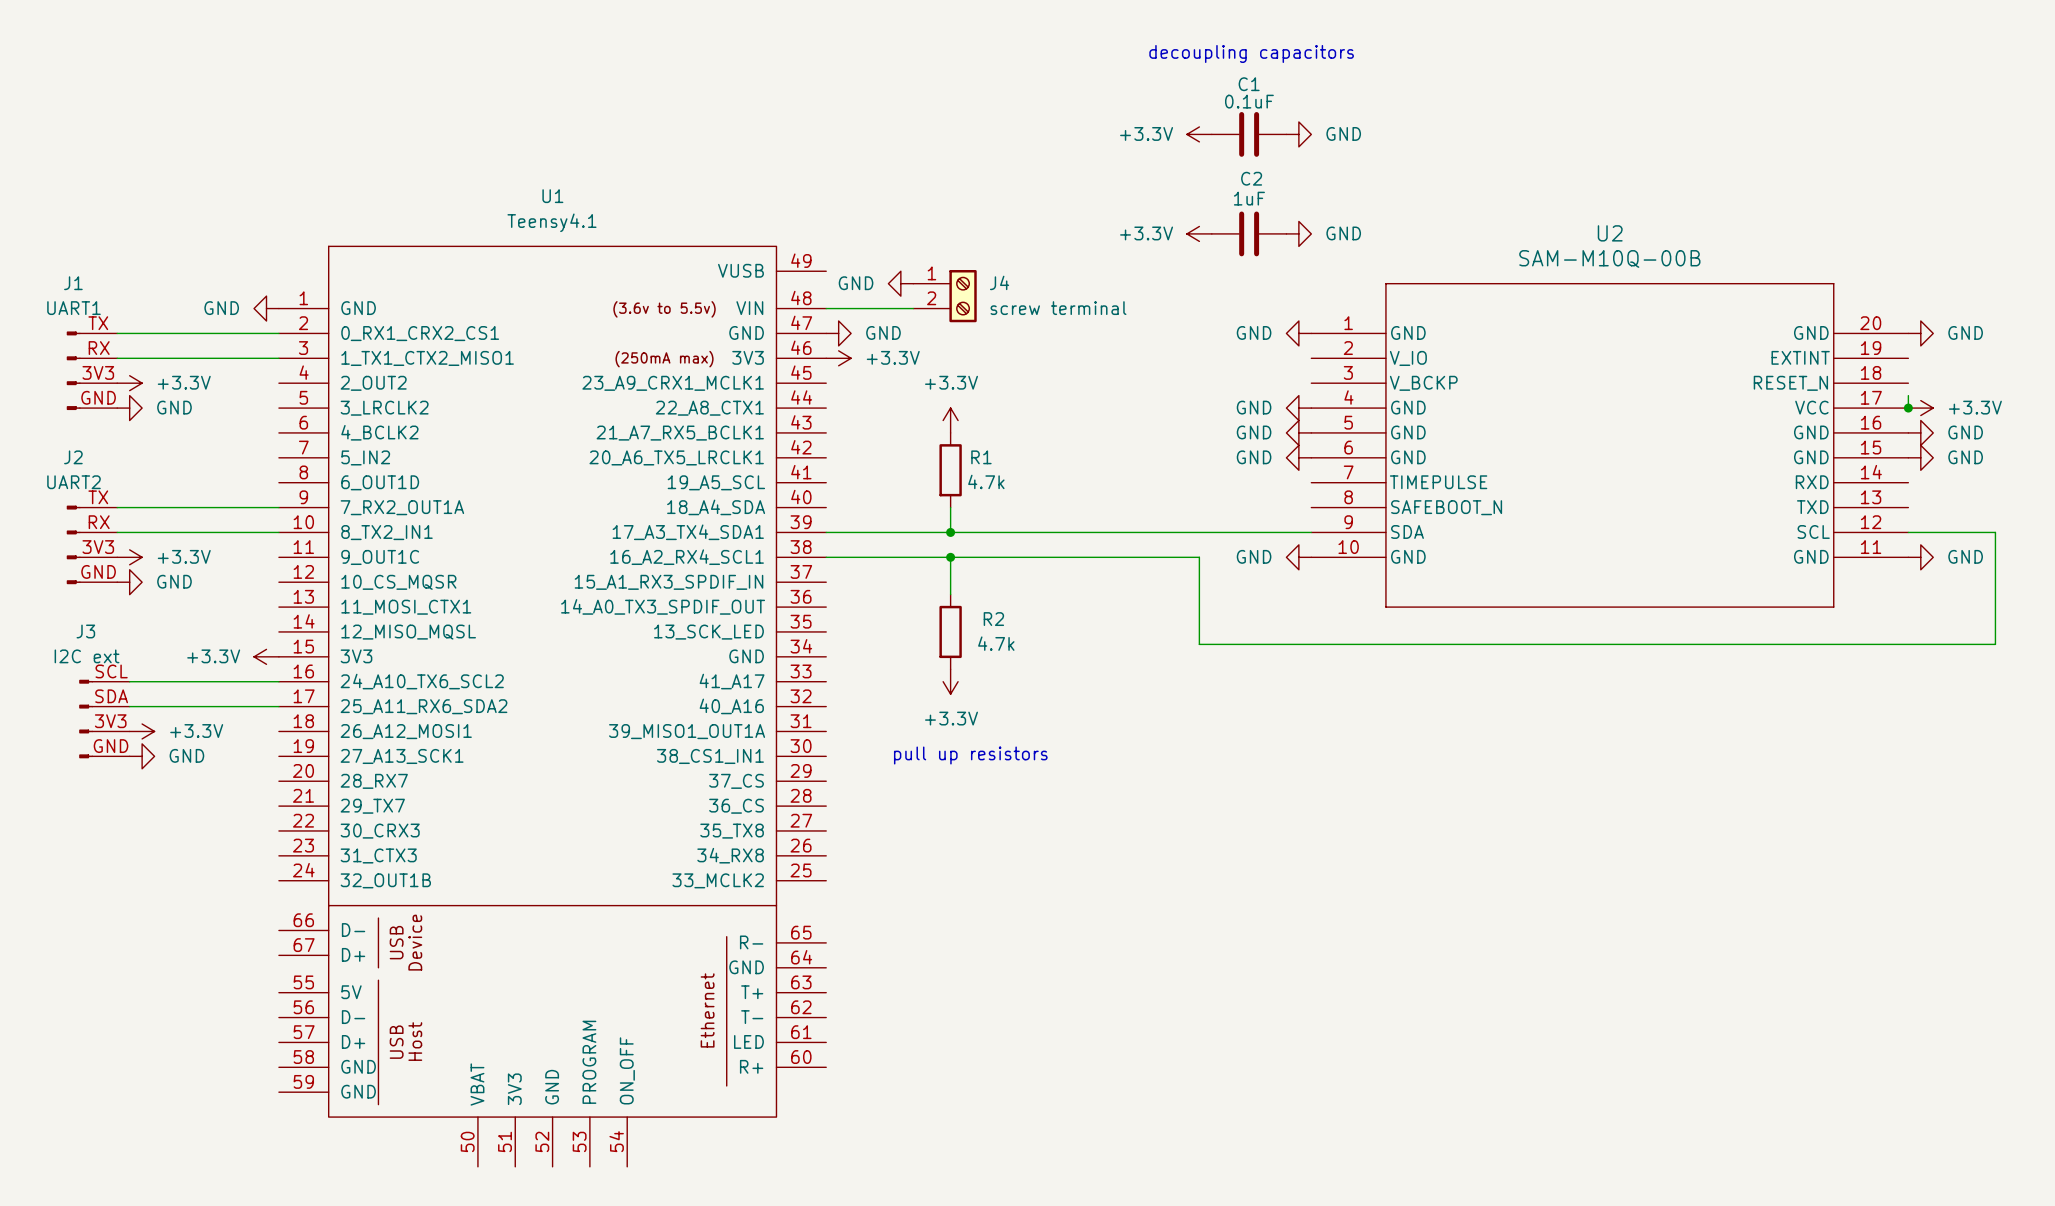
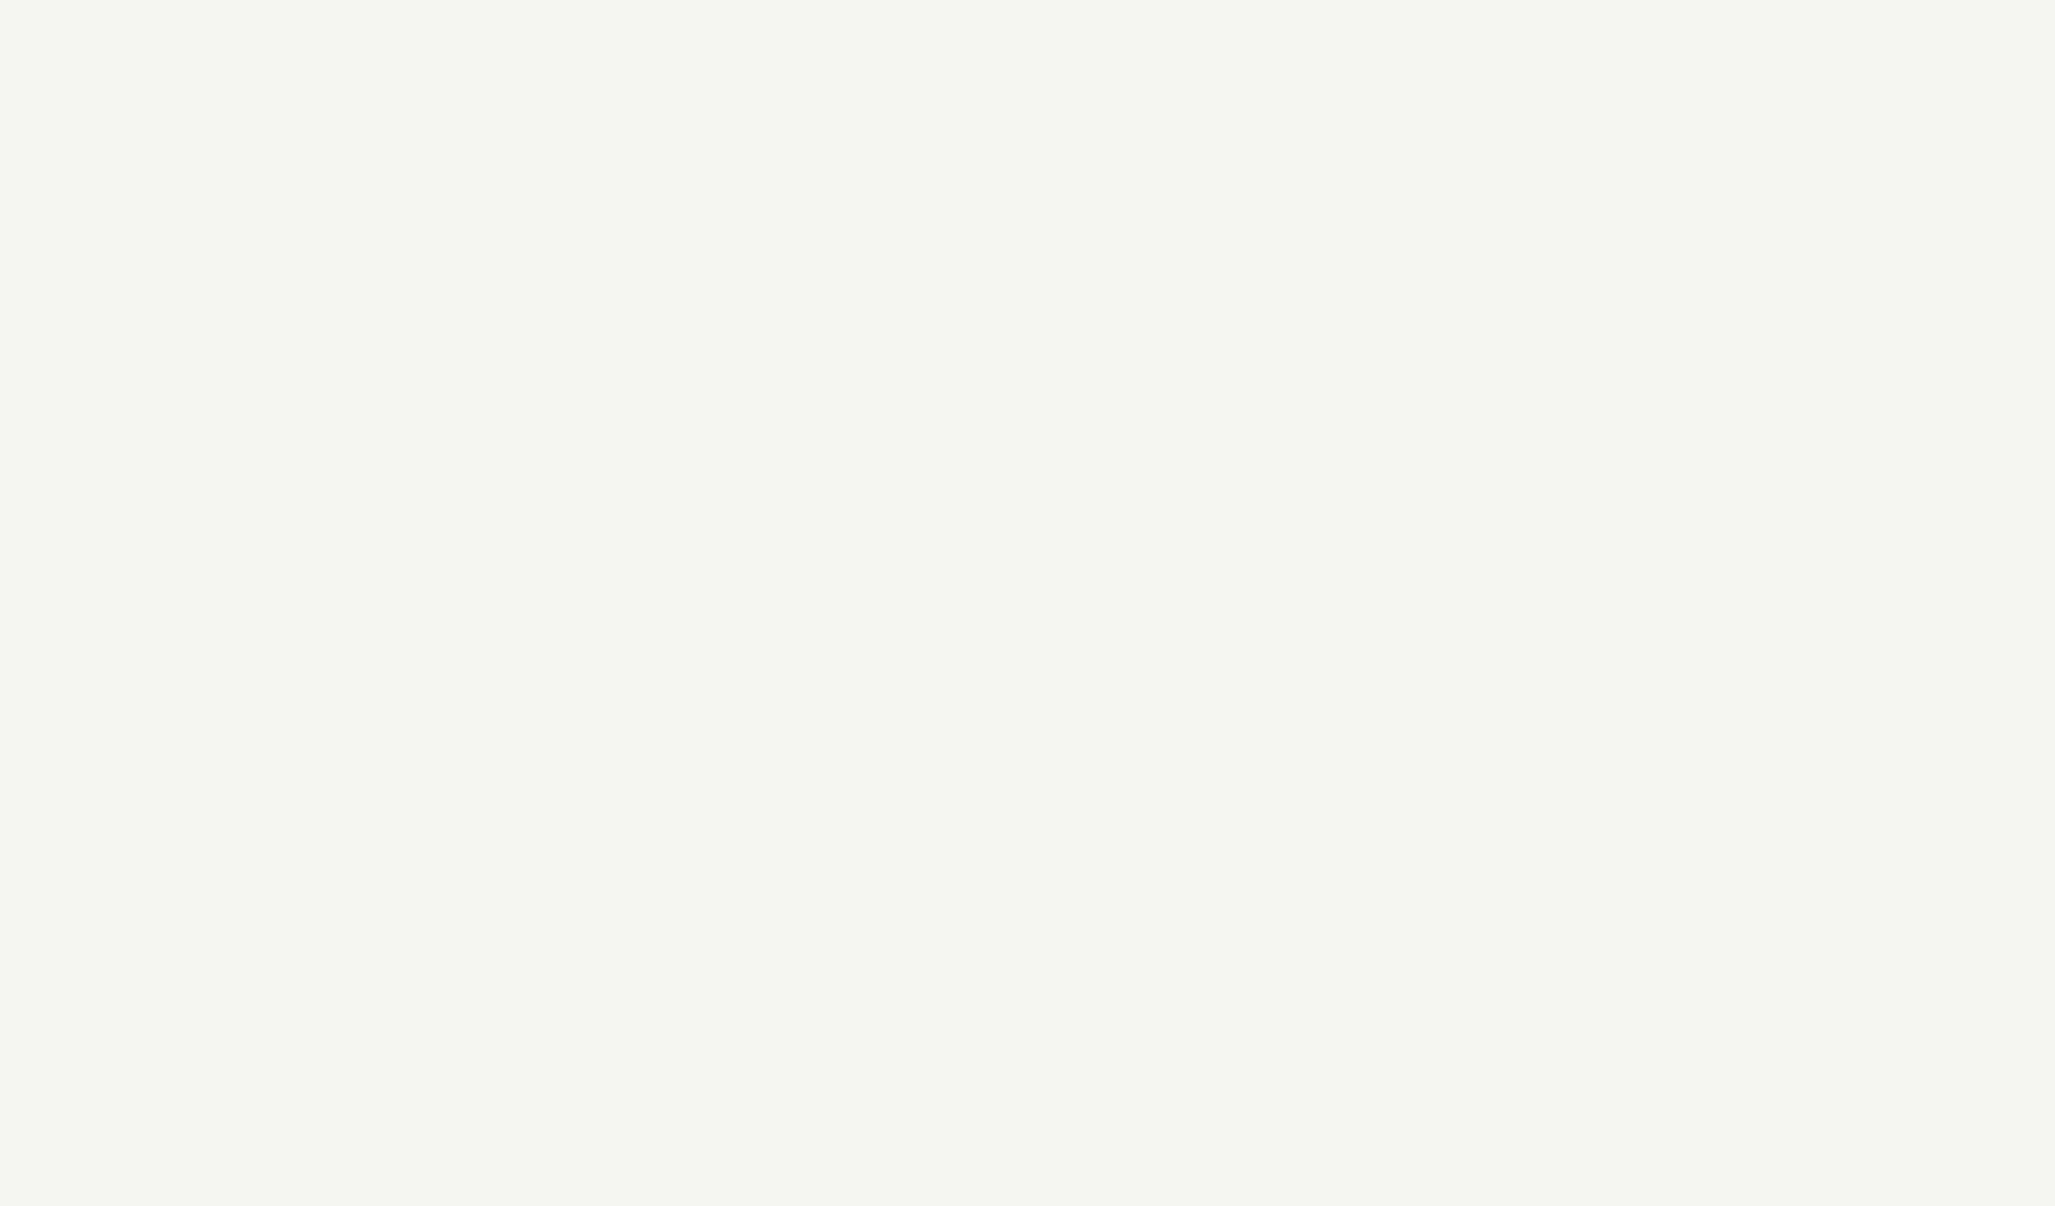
text: decoupling capacitors (1251, 53) -> none
power symbol: +3.3V (1199, 134) -> none
C1: 0.1uF (1249, 134) -> none
power symbol: GND (1298, 134) -> none
power symbol: +3.3V (1199, 233) -> none
C2: 1uF (1249, 233) -> none
power symbol: GND (1298, 233) -> none
power symbol: GND (900, 283) -> none
J4: screw terminal (945, 296) -> none
power symbol: GND (266, 308) -> none
wire: (826, 308) (913, 308) -> none
wire: (117, 333) (278, 333) -> none
power symbol: GND (838, 333) -> none
power symbol: GND (1298, 333) -> none
power symbol: GND (1920, 333) -> none
wire: (117, 358) (278, 358) -> none
power symbol: +3.3V (838, 358) -> none
J1: UART1 (91, 370) -> none
power symbol: +3.3V (129, 383) -> none
wire: (1908, 395) (1908, 408) -> none
power symbol: GND (129, 408) -> none
power symbol: GND (1298, 408) -> none
junction: (1908, 408) -> none
power symbol: +3.3V (1920, 408) -> none
power symbol: +3.3V (950, 420) -> none
power symbol: GND (1298, 432) -> none
power symbol: GND (1920, 432) -> none
U2: SAM-M10Q-00B (1609, 445) -> none
power symbol: GND (1298, 457) -> none
power symbol: GND (1920, 457) -> none
R1: 4.7k (950, 470) -> none
wire: (117, 507) (278, 507) -> none
wire: (950, 507) (950, 532) -> none
wire: (117, 532) (278, 532) -> none
wire: (826, 532) (1311, 532) -> none
junction: (950, 532) -> none
wire: (1908, 532) (1995, 532) (1995, 644) (1199, 644) (1199, 557) (826, 557) -> none
J2: UART2 (91, 544) -> none
power symbol: +3.3V (129, 557) -> none
wire: (950, 557) (950, 594) -> none
junction: (950, 557) -> none
power symbol: GND (1298, 557) -> none
power symbol: GND (1920, 557) -> none
power symbol: GND (129, 582) -> none
R2: 4.7k (950, 631) -> none
power symbol: +3.3V (266, 656) -> none
wire: (129, 681) (278, 681) -> none
power symbol: +3.3V (950, 681) -> none
wire: (129, 706) (278, 706) -> none
U1: Teensy4.1 (552, 706) -> none
J3: I2C ext (104, 719) -> none
power symbol: +3.3V (142, 731) -> none
text: pull up resistors (970, 755) -> none
power symbol: GND (142, 756) -> none

